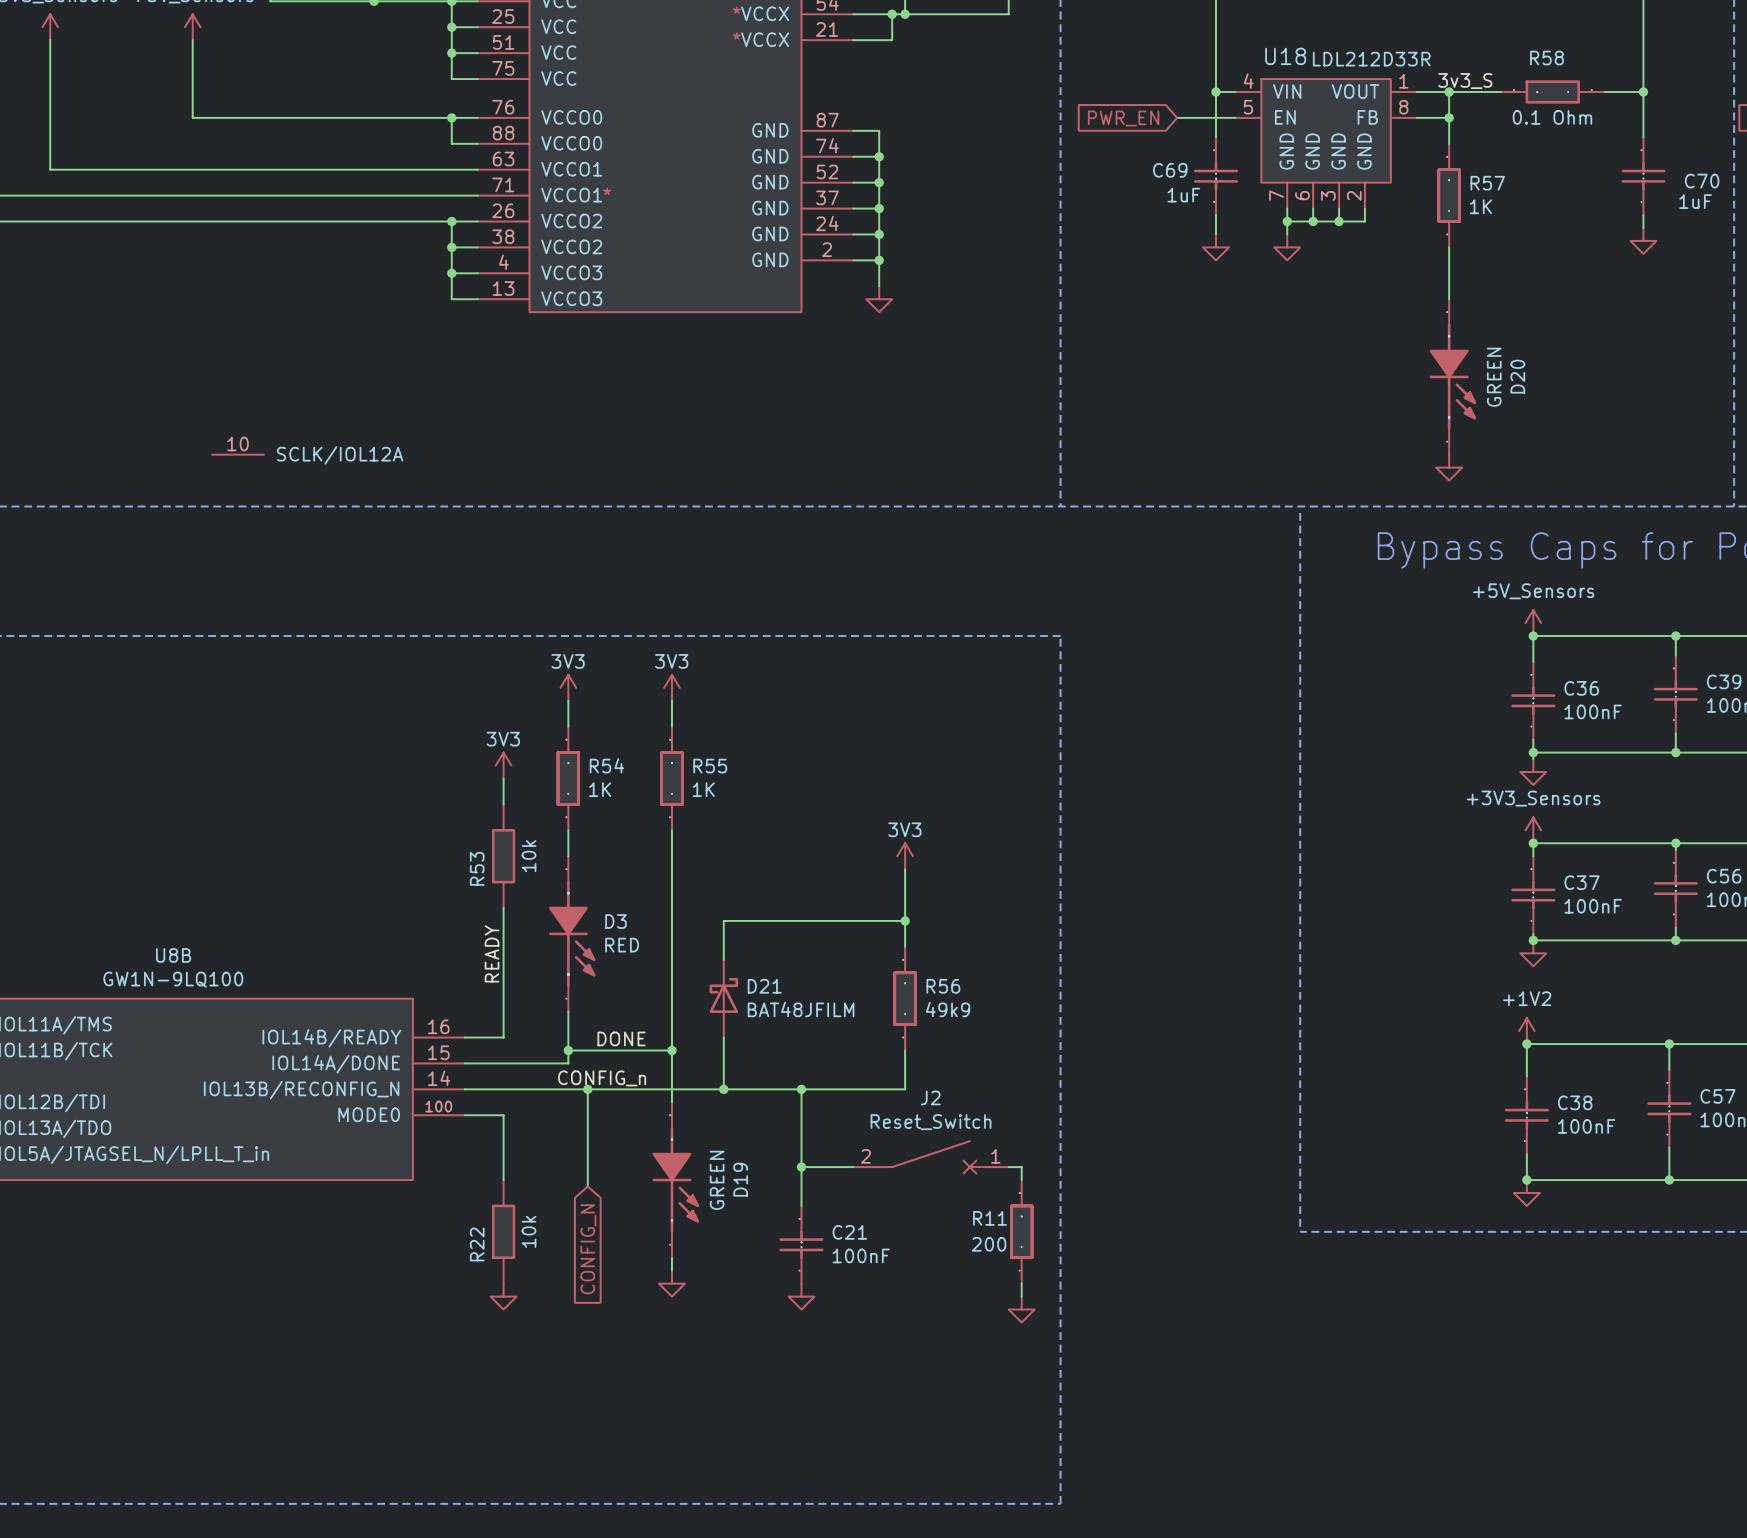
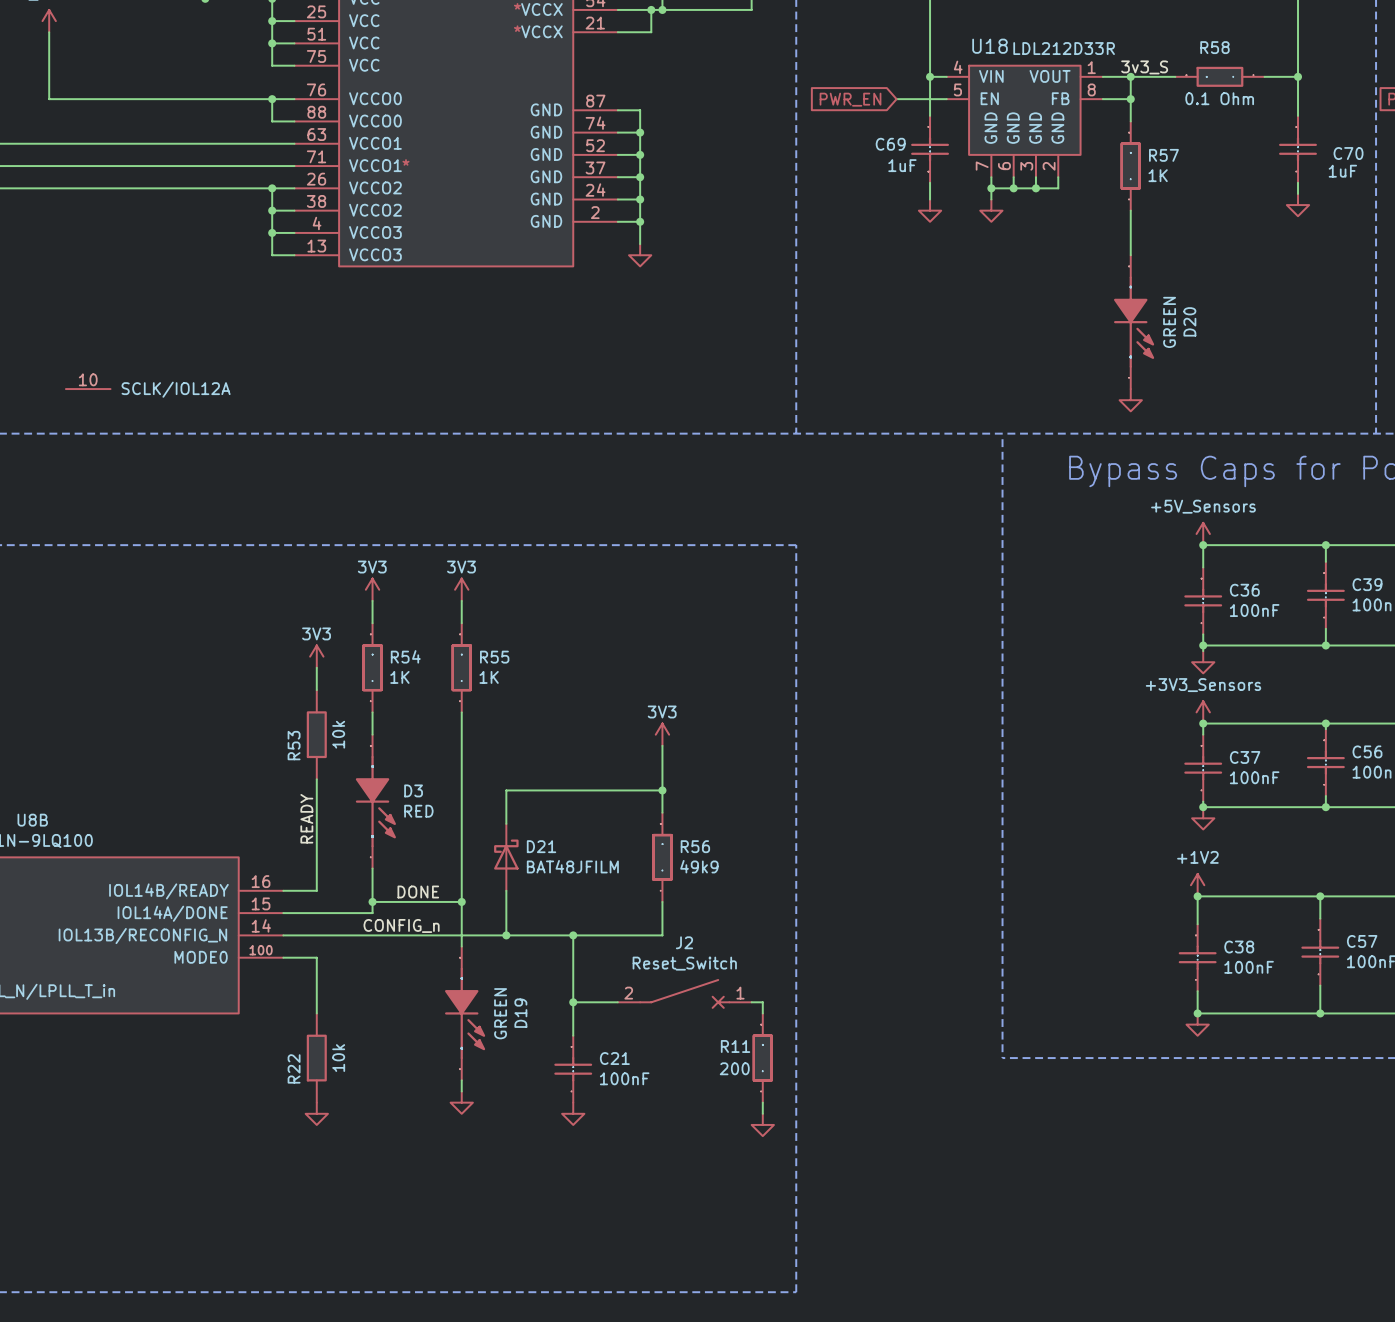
wire: (587, 1089) (587, 1186) -> none
junction: (587, 1089) -> none
global label: CONFIG_N (588, 1249) -> none

